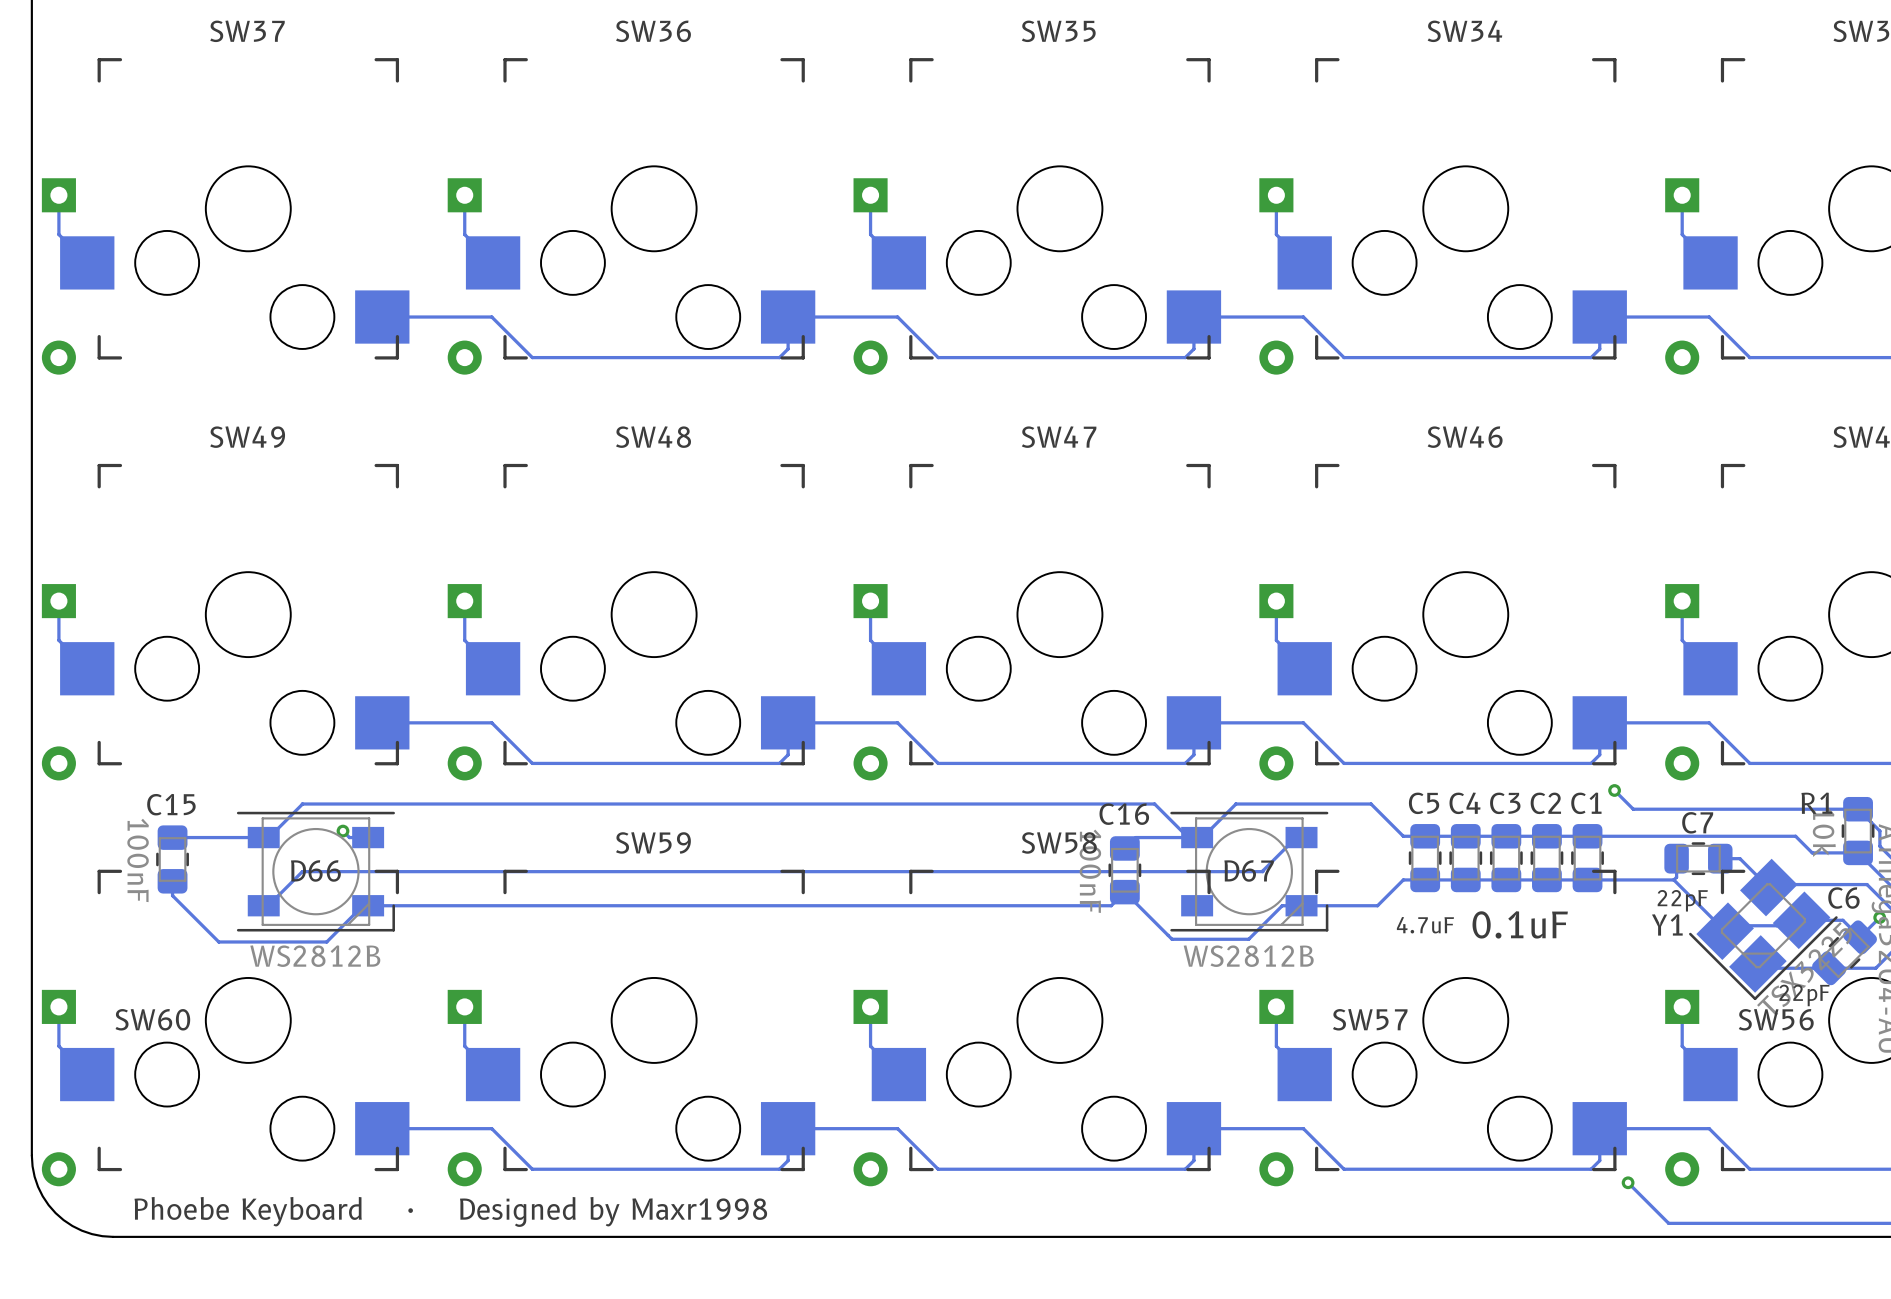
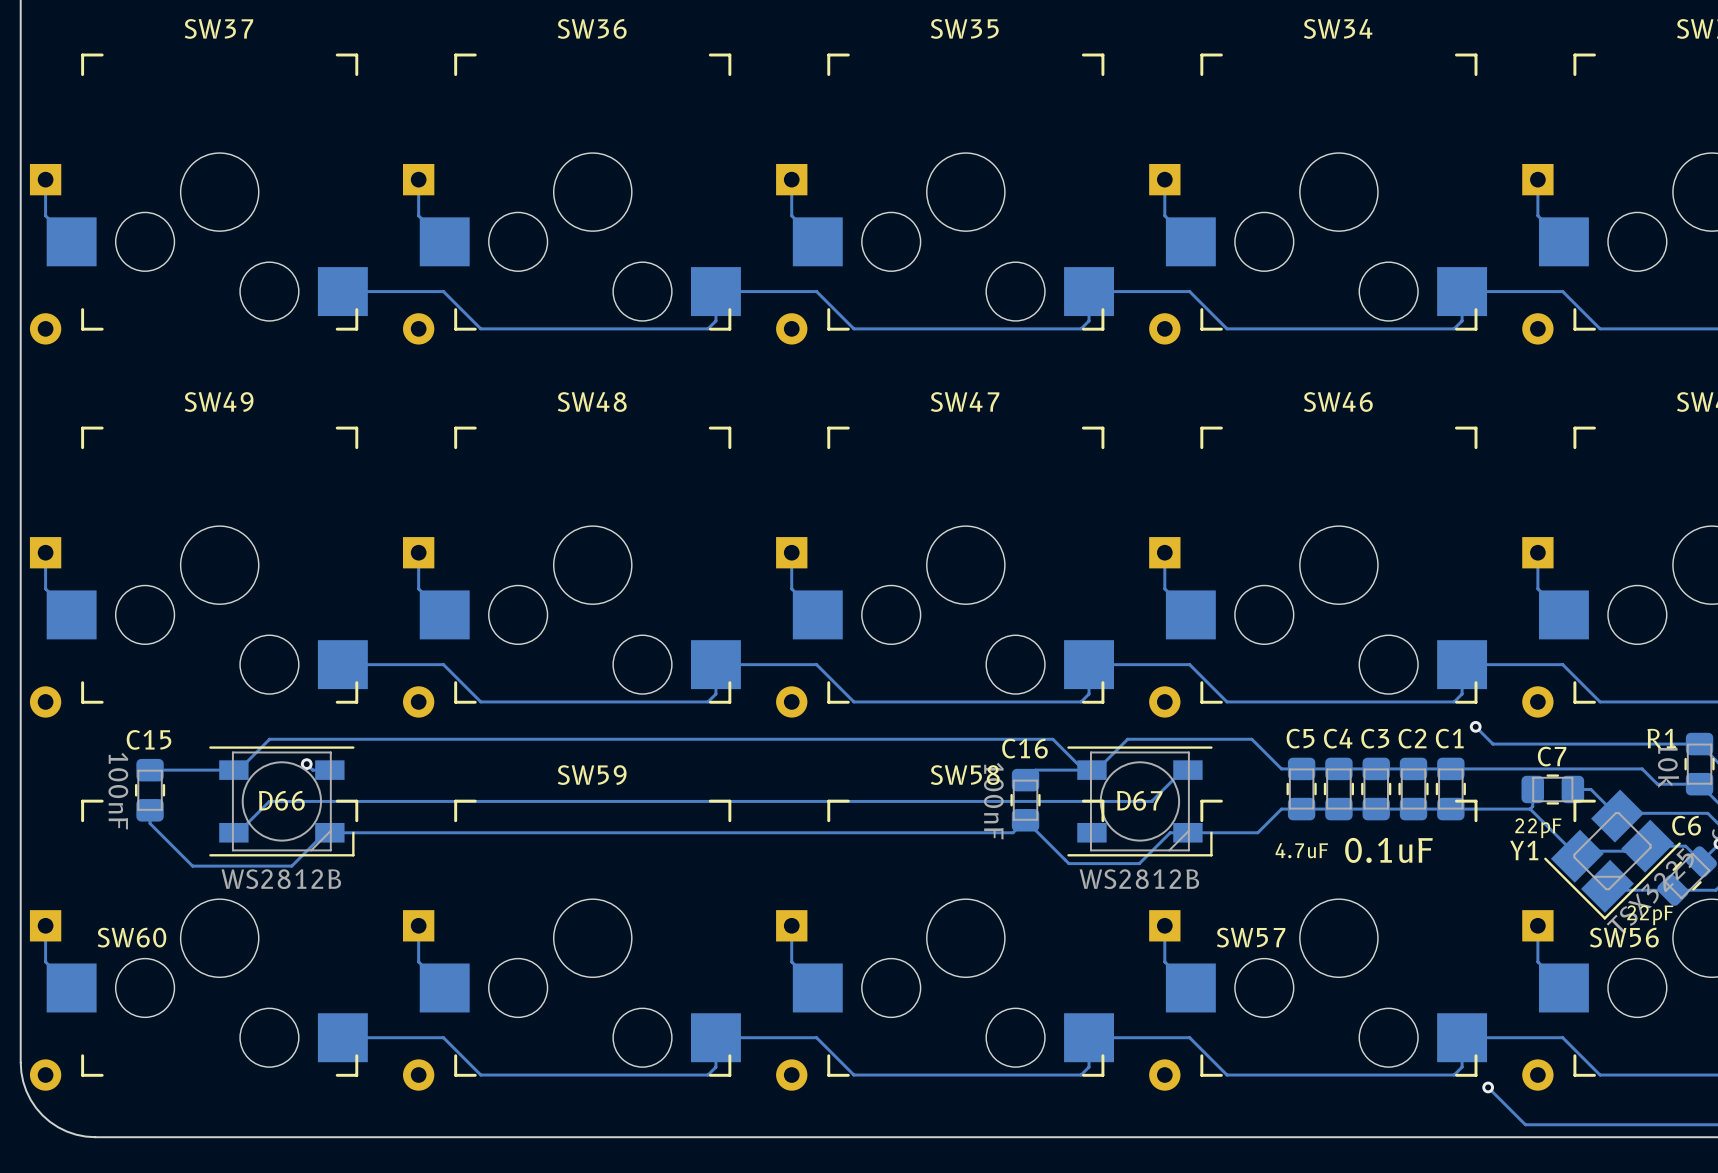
text: · (410, 1210) -> none
text: Phoebe Keyboard (248, 1211) -> none
text: Designed by Maxr1998 (613, 1211) -> none

